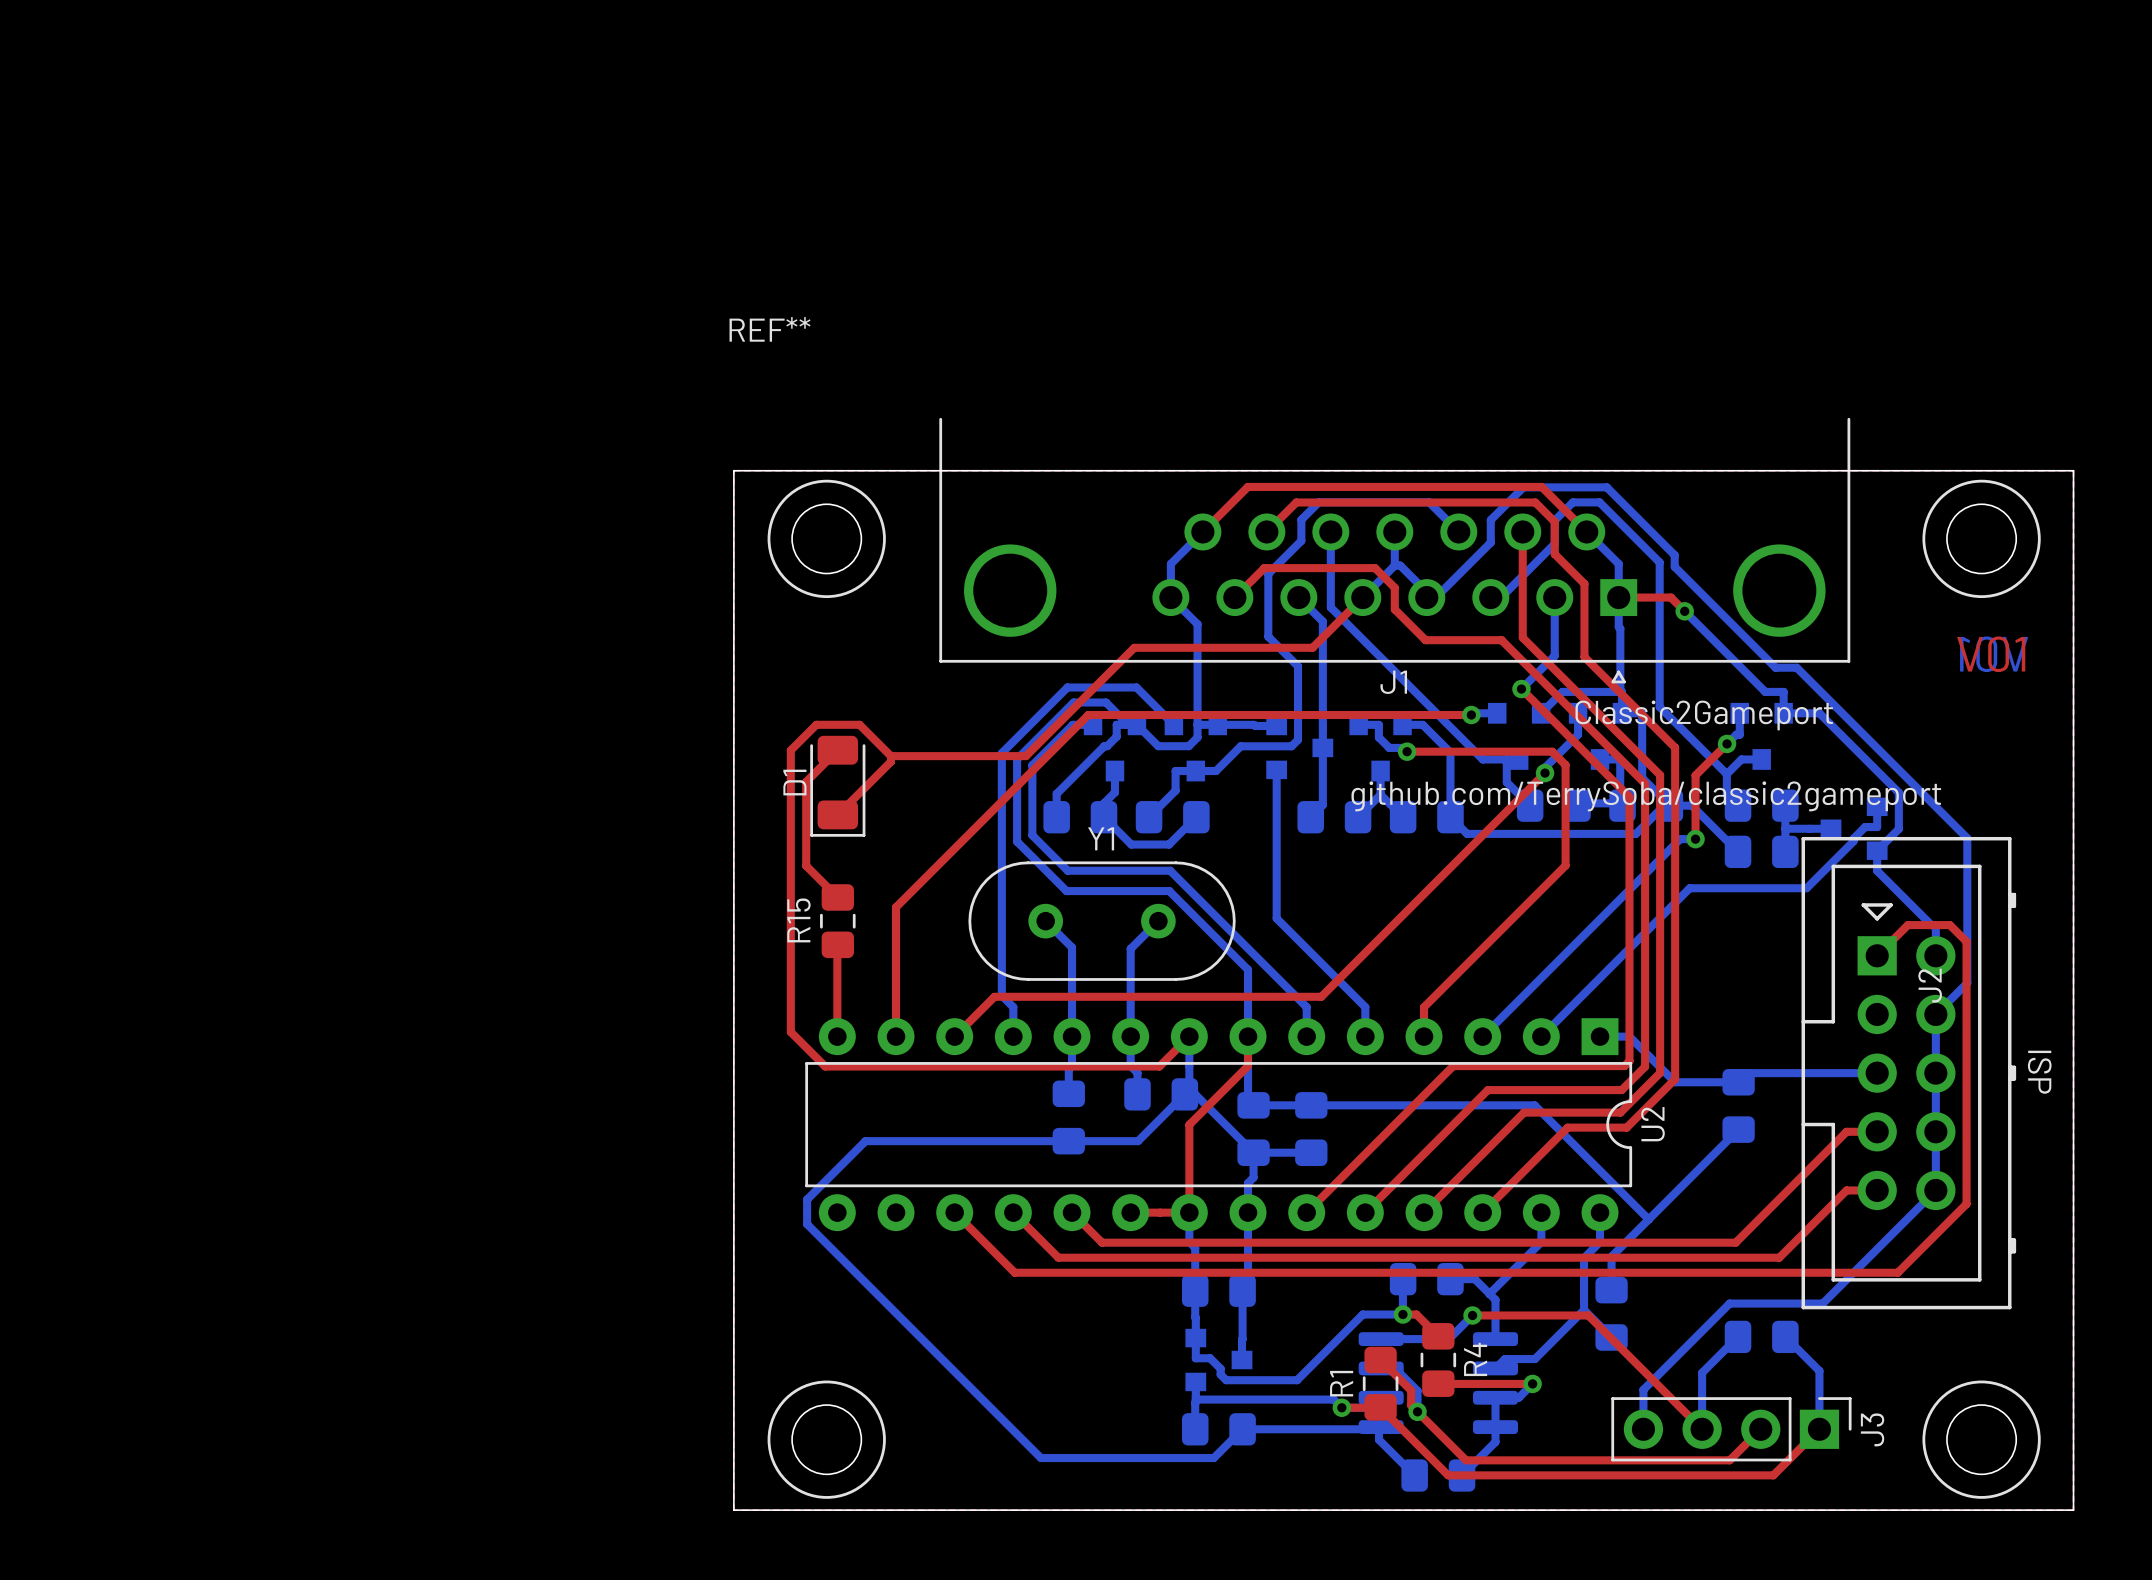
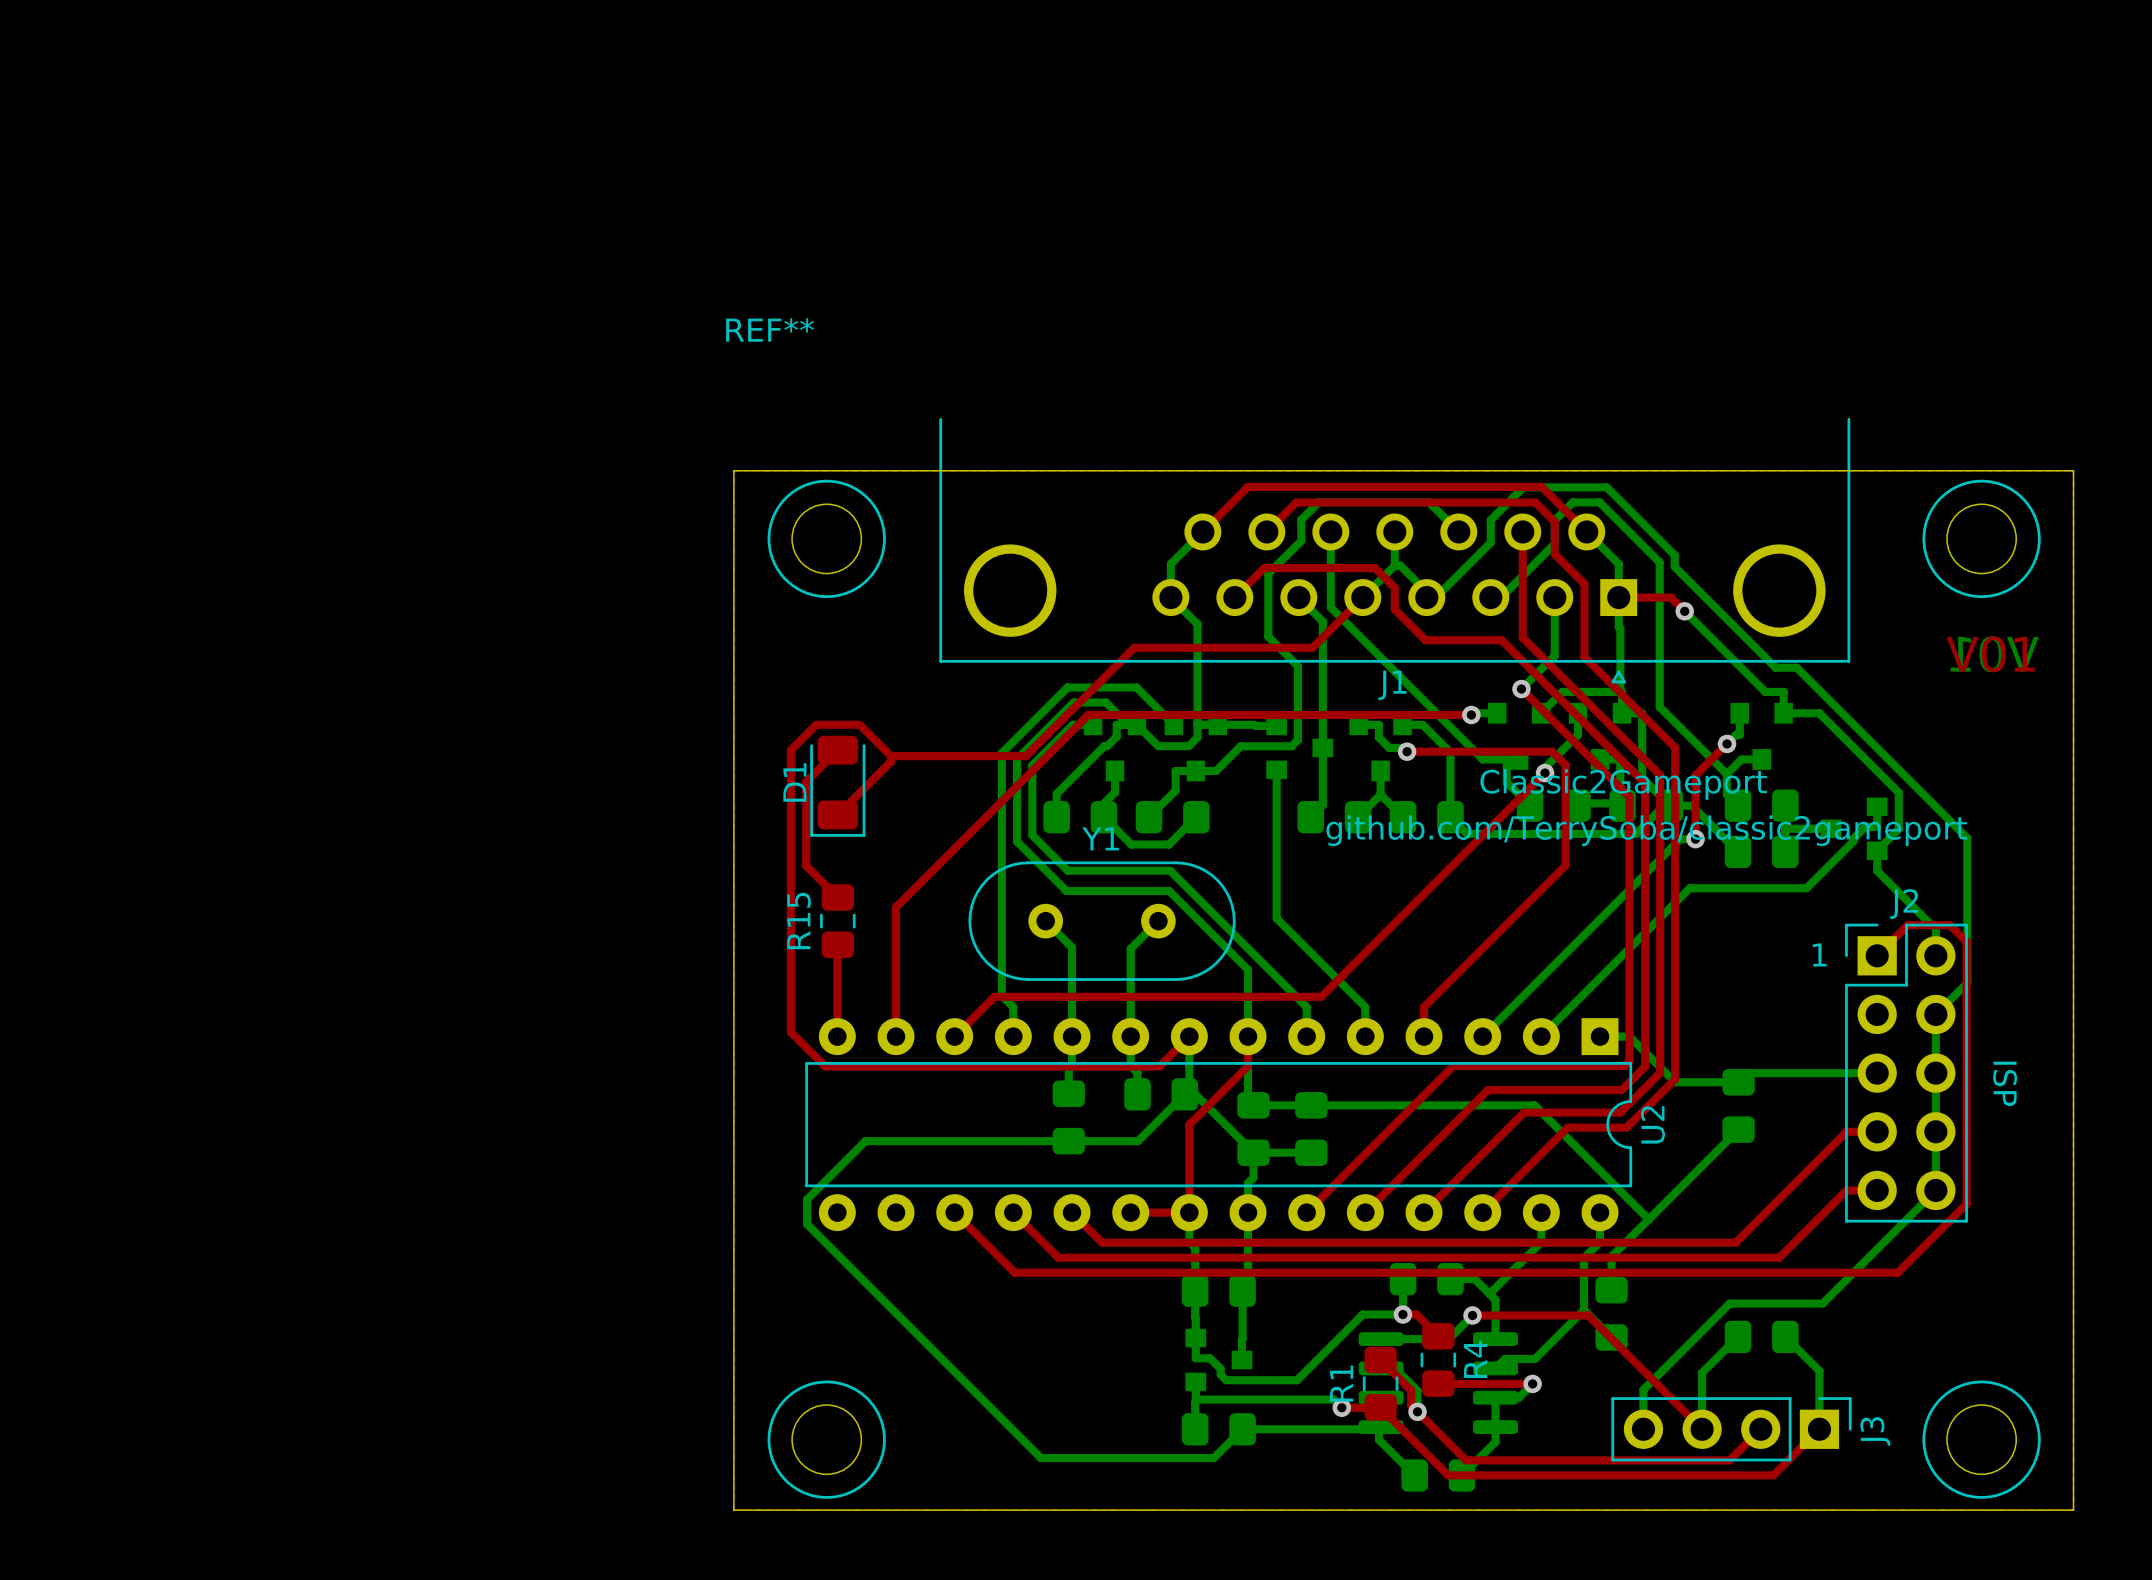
text position: Classic2Gameport (1704, 715) -> Classic2Gameport (1623, 784)
text position: github.com/TerrySoba/classic2gameport (1646, 796) -> github.com/TerrySoba/classic2gameport (1646, 830)
J2 footprint: [1801, 836, 2017, 1310] -> [1845, 923, 1968, 1223]
text: none -> 1 (1819, 954)
J2 name position: J2 (1930, 985) -> J2 (1904, 904)
text position: ISP (2039, 1072) -> ISP (2005, 1083)

